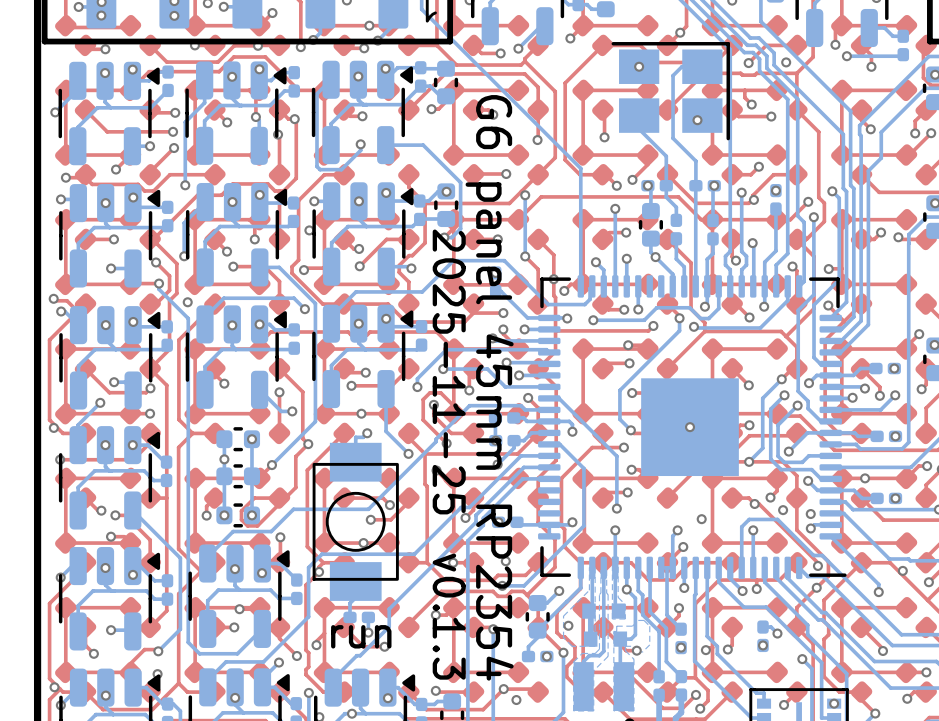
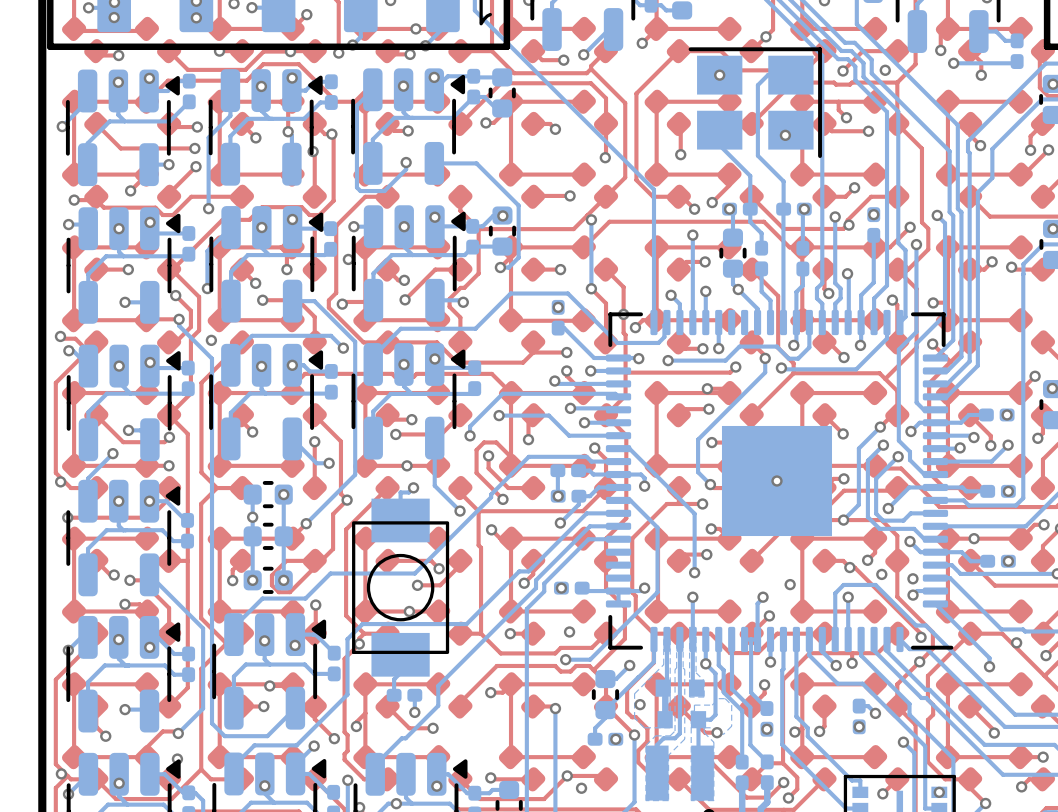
text: 2025-11-25 (449, 371) -> none
text: G6 panel 45mm RP2354 (489, 387) -> none
text: v0.1.3 (449, 616) -> none
text: run (361, 636) -> none

